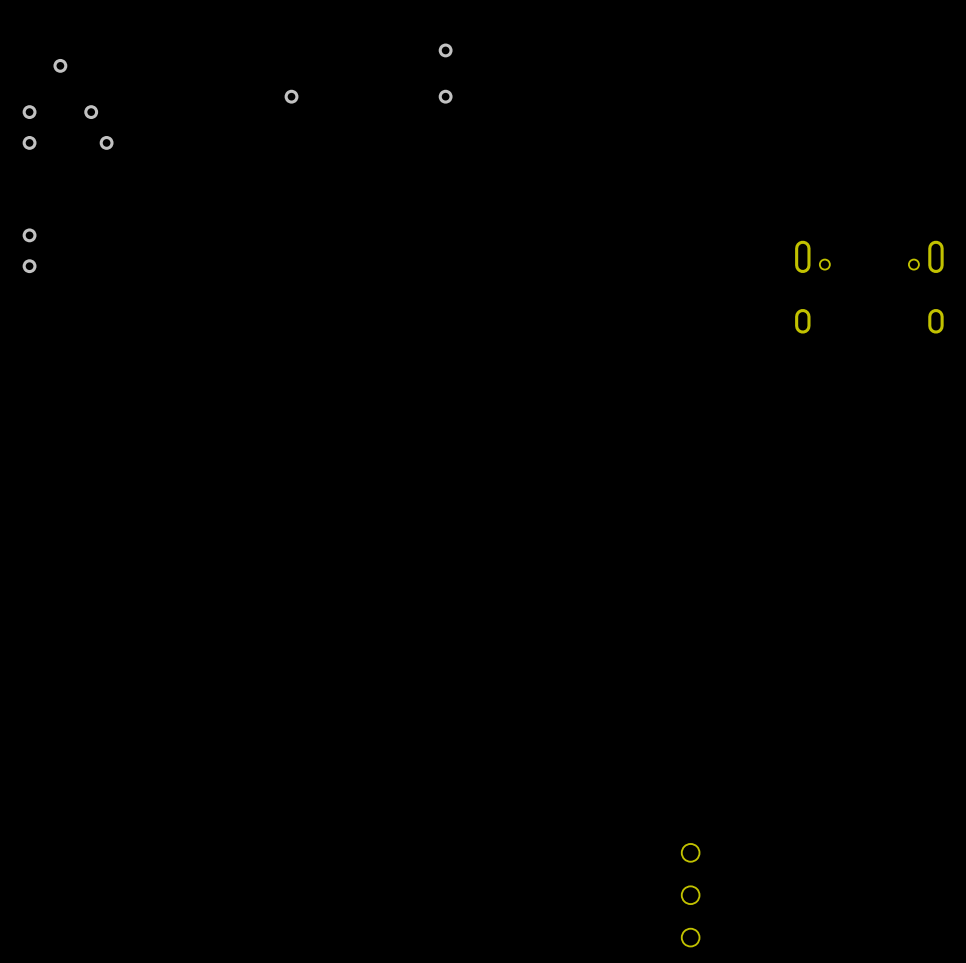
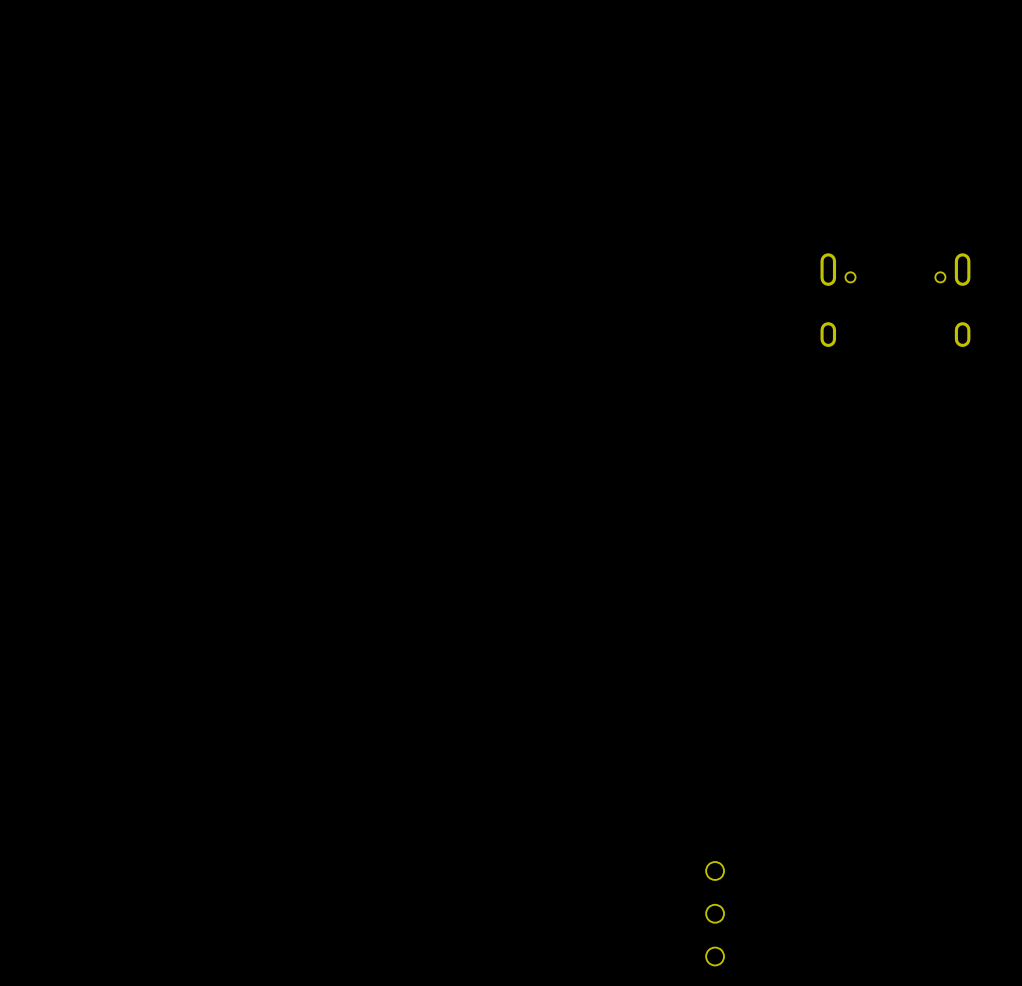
via: (445, 50) -> none
via: (60, 65) -> none
via: (291, 96) -> none
via: (445, 96) -> none
via: (29, 112) -> none
via: (91, 112) -> none
via: (29, 142) -> none
via: (106, 142) -> none
via: (29, 235) -> none
via: (29, 266) -> none

